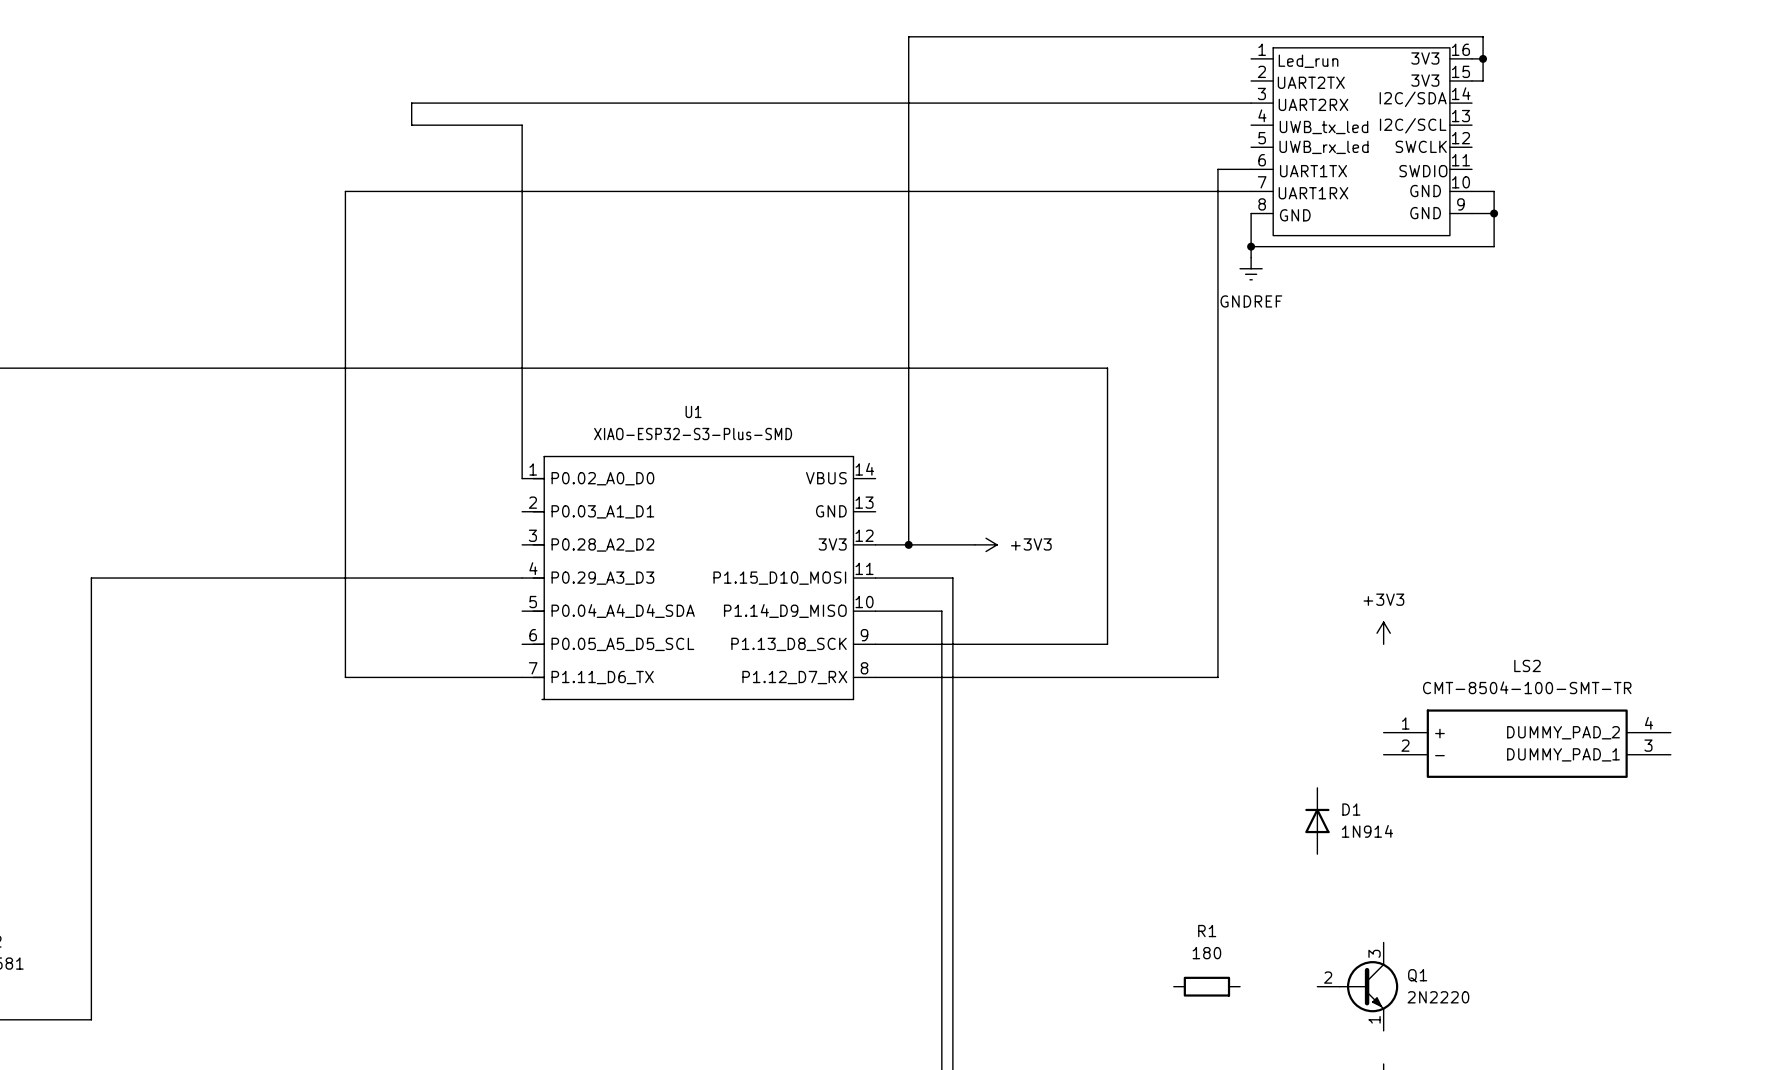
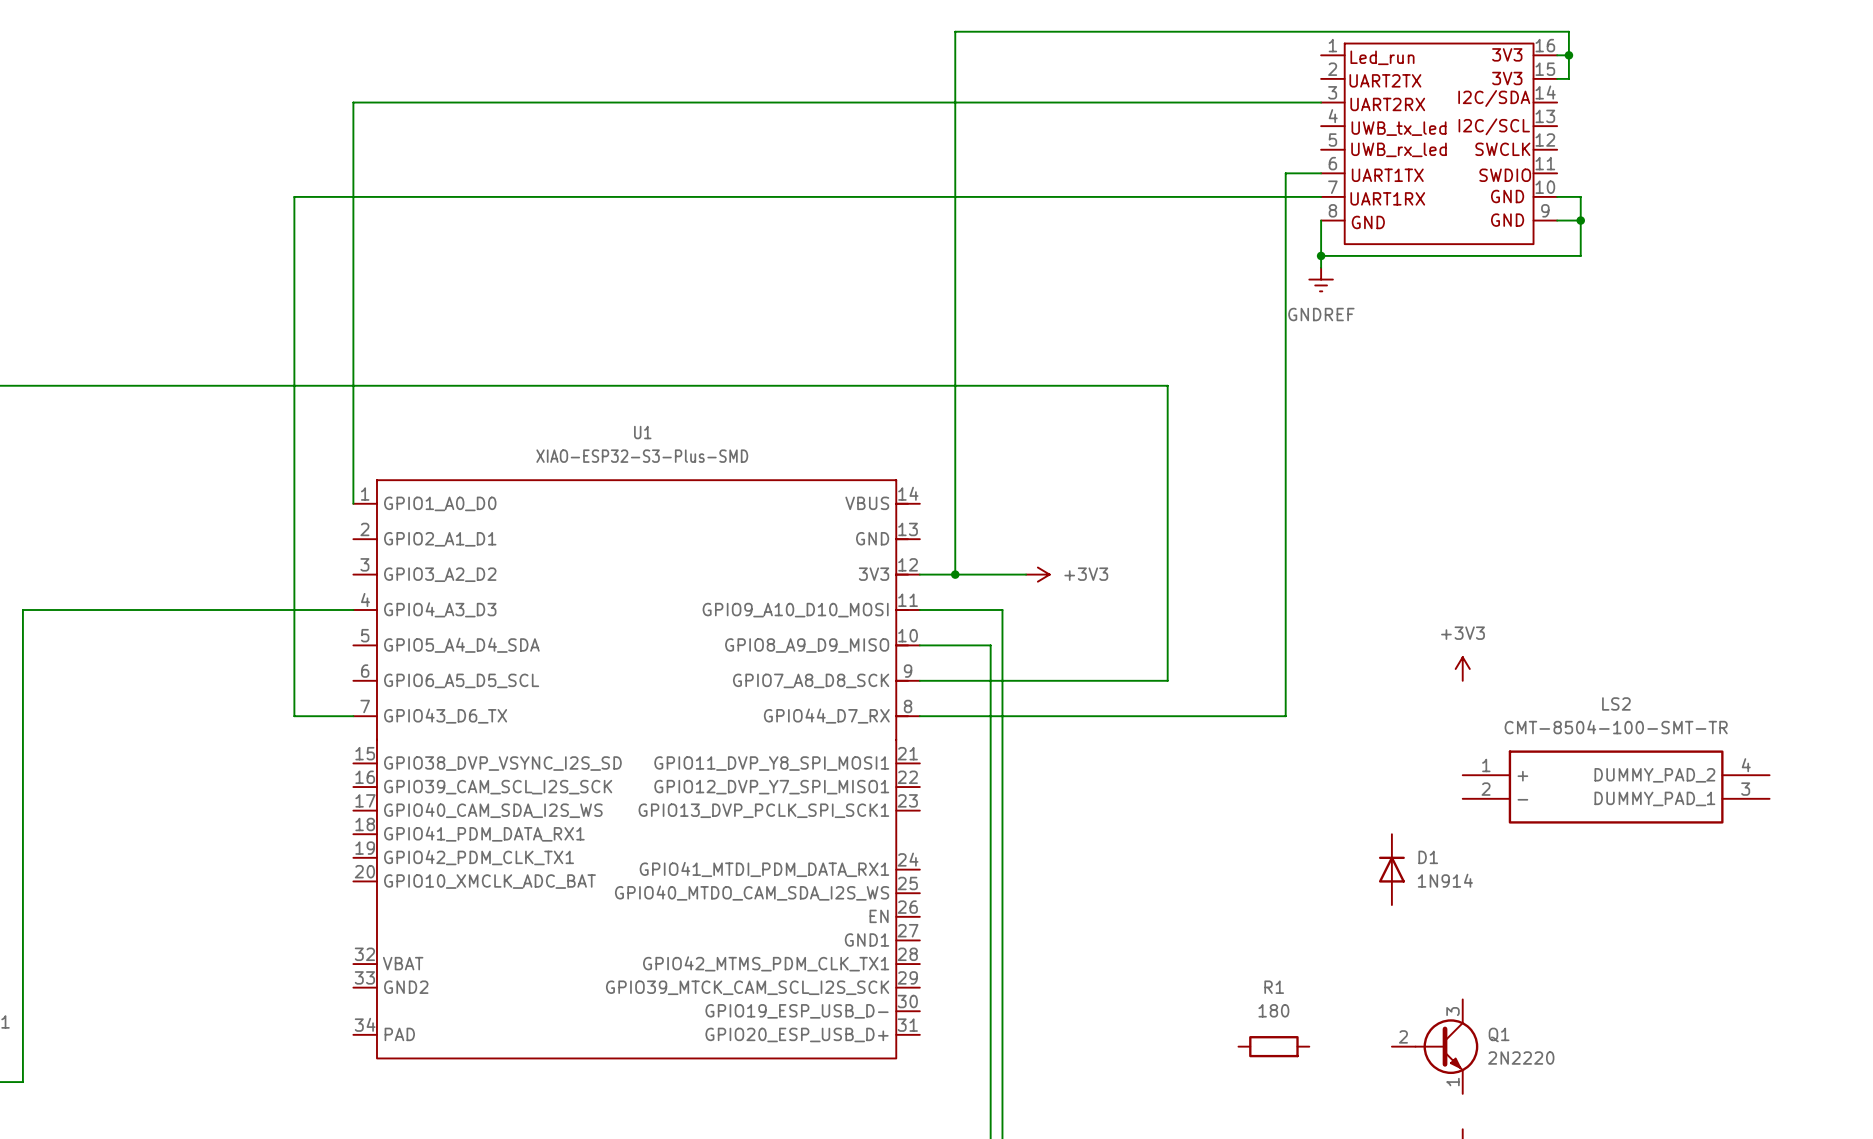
wire: (411, 103) (411, 125) (522, 125) (522, 478) -> (424, 102) (353, 102) (353, 196) (294, 196) (294, 716) (353, 716)
U1 name position: U1 (693, 411) -> U1 (642, 432)
U1 value position: XIAO-ESP32-S3-Plus-SMD (693, 434) -> XIAO-ESP32-S3-Plus-SMD (642, 456)
U1 symbol: [522, 455, 876, 701] -> [353, 479, 920, 1059]
wire: (345, 478) (345, 677) (522, 677) -> none
wire: (91, 578) (91, 1019) (36, 1019) -> (81, 610) (22, 610) (22, 1082)
wire: (345, 578) (522, 578) -> none

